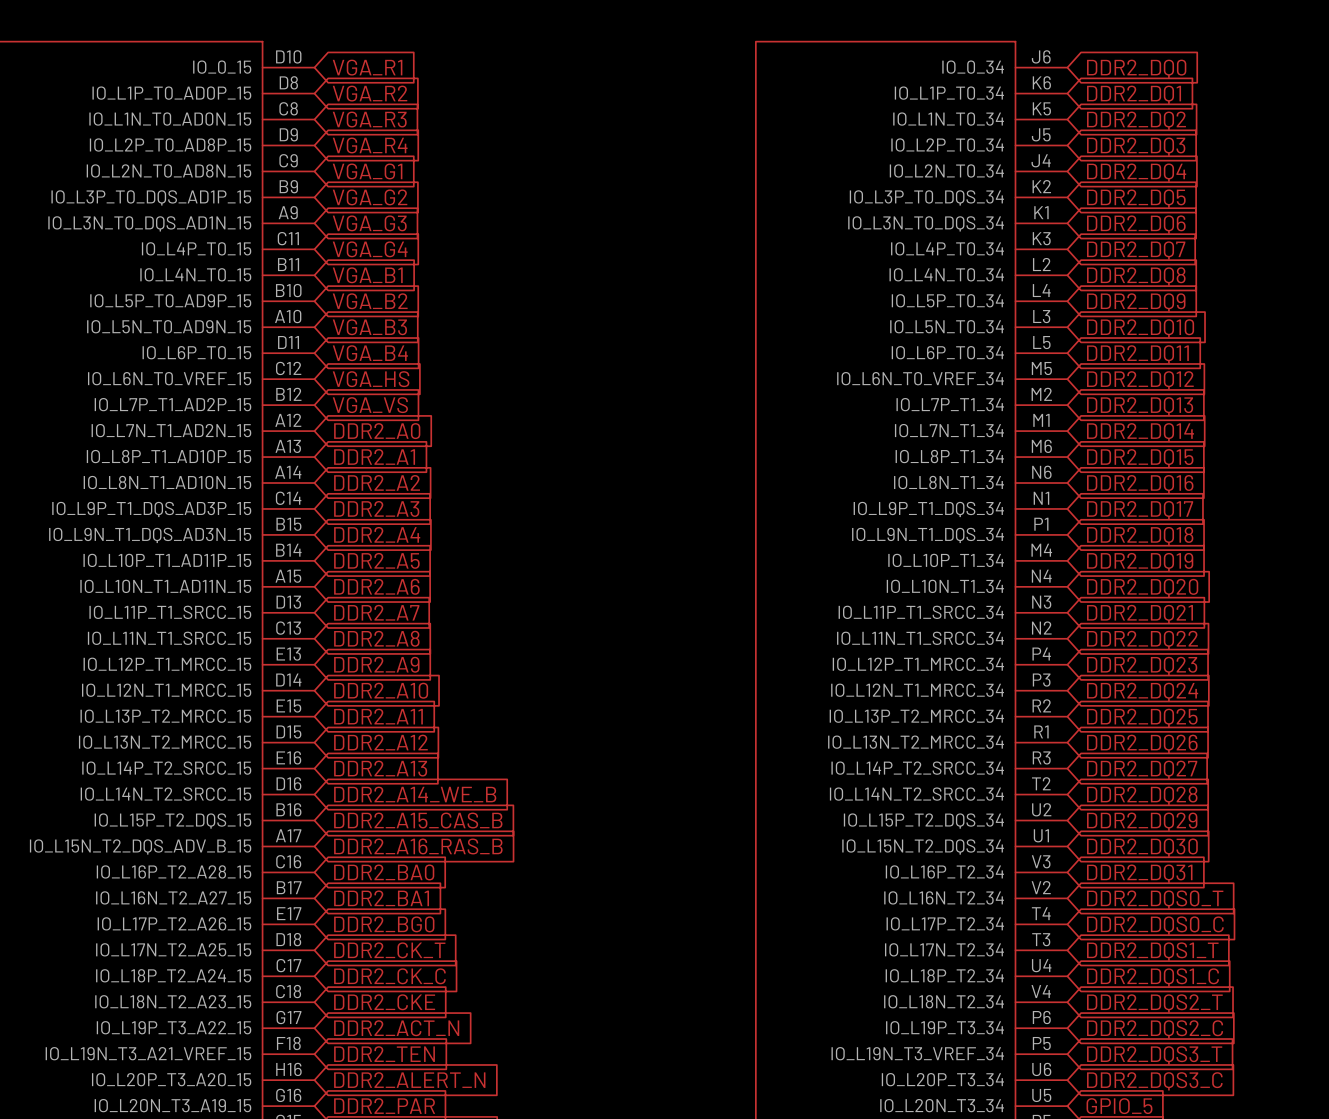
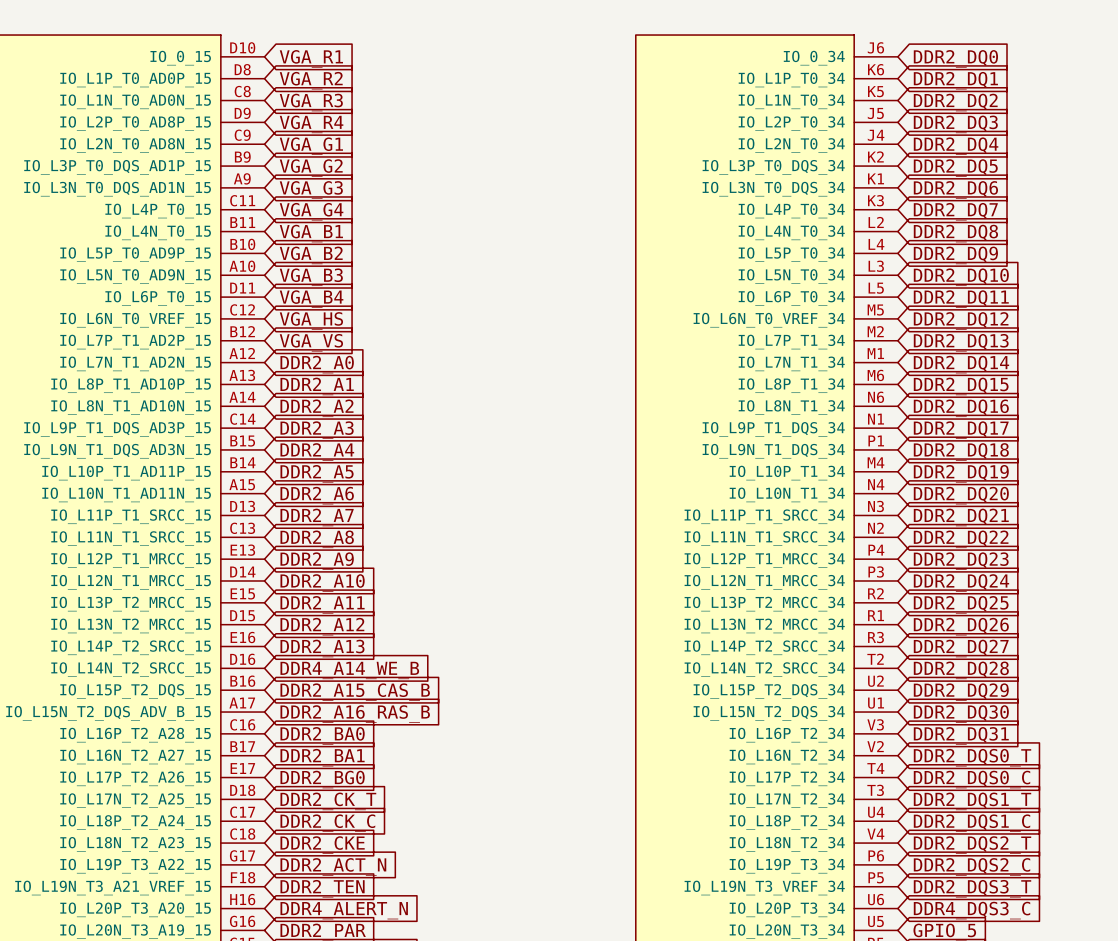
global label: DDR2_A14_WE_B (415, 794) -> DDR4_A14_WE_B (349, 670)
global label: DDR2_ALERT_N (409, 1080) -> DDR4_ALERT_N (344, 910)
global label: DDR2_DQS3_C (1154, 1081) -> DDR4_DQS3_C (972, 910)

